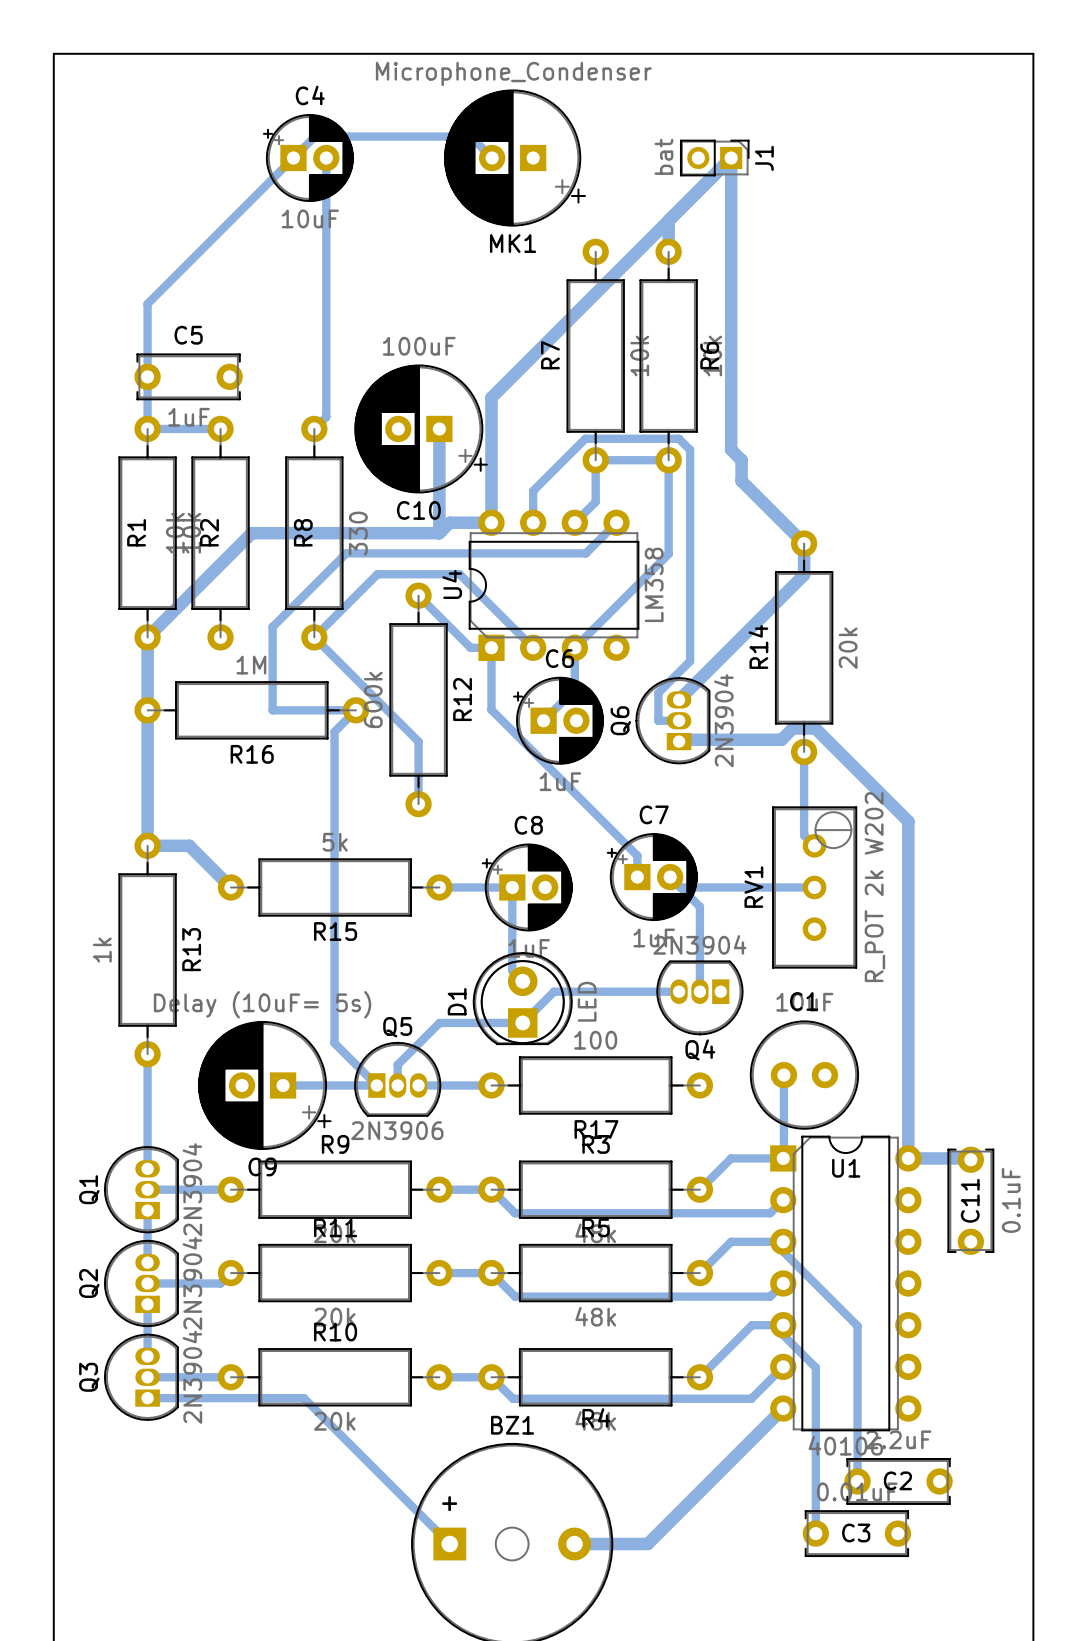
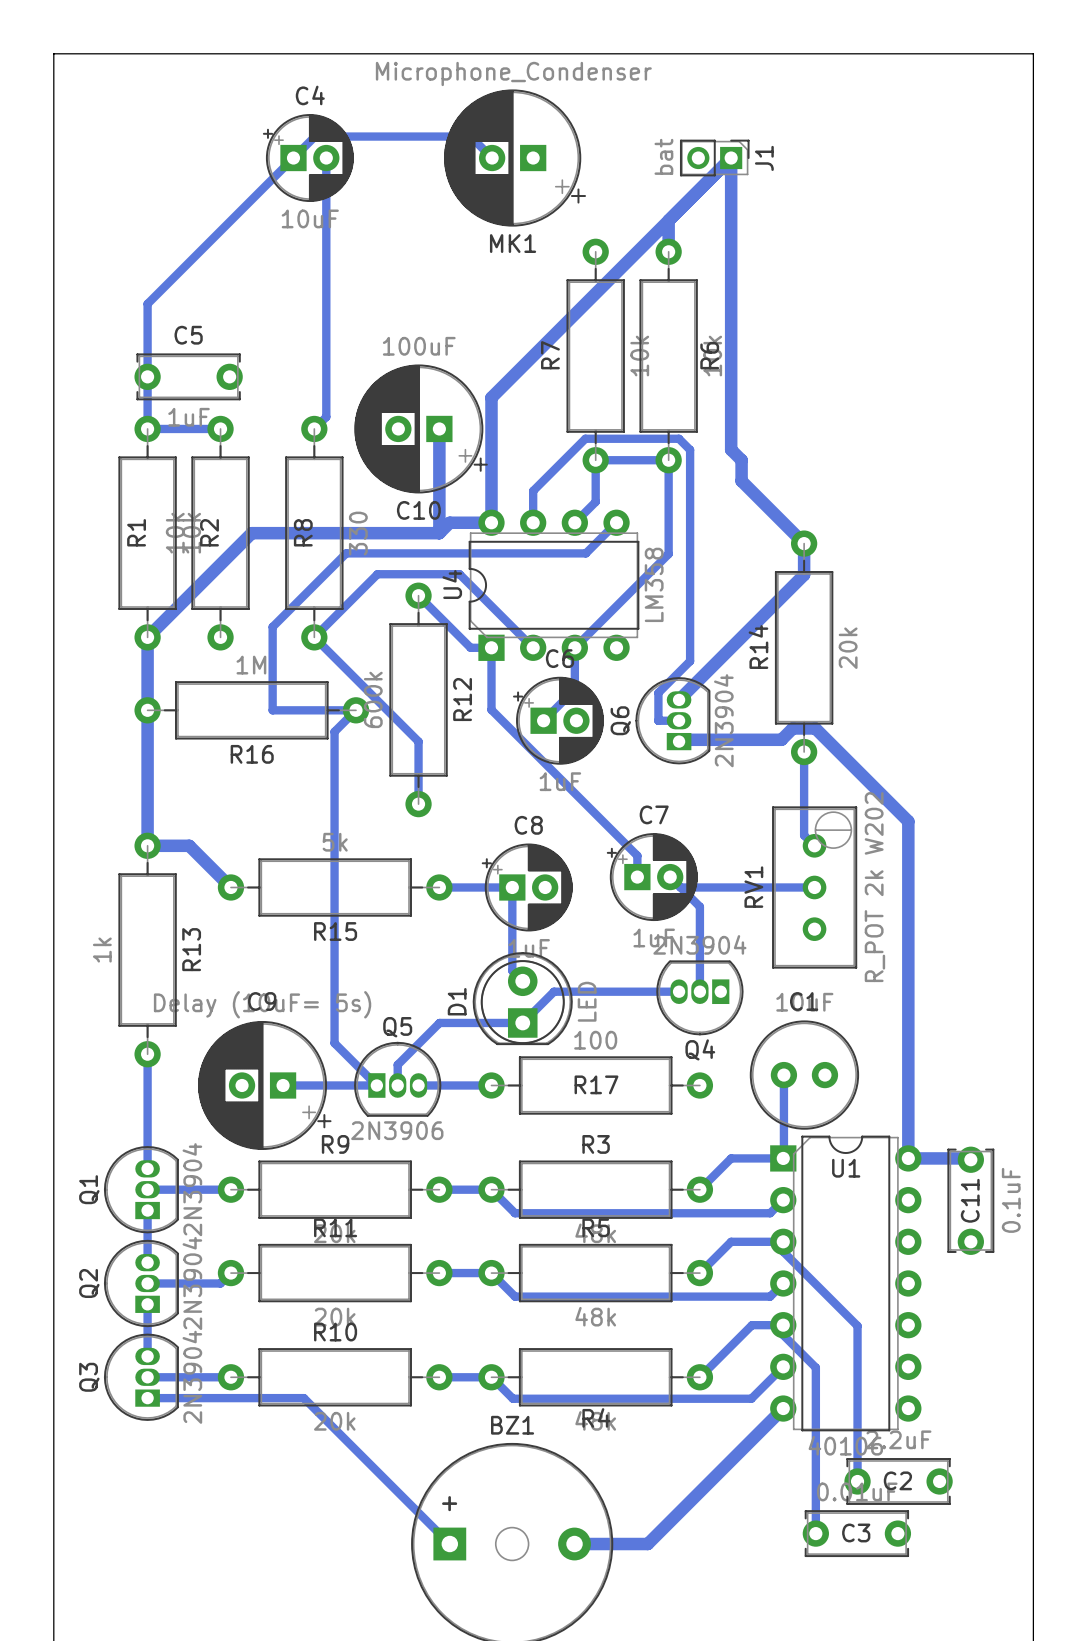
R17 name position: R17 (596, 1129) -> R17 (596, 1084)
C9 name position: C9 (262, 1166) -> C9 (262, 1001)

